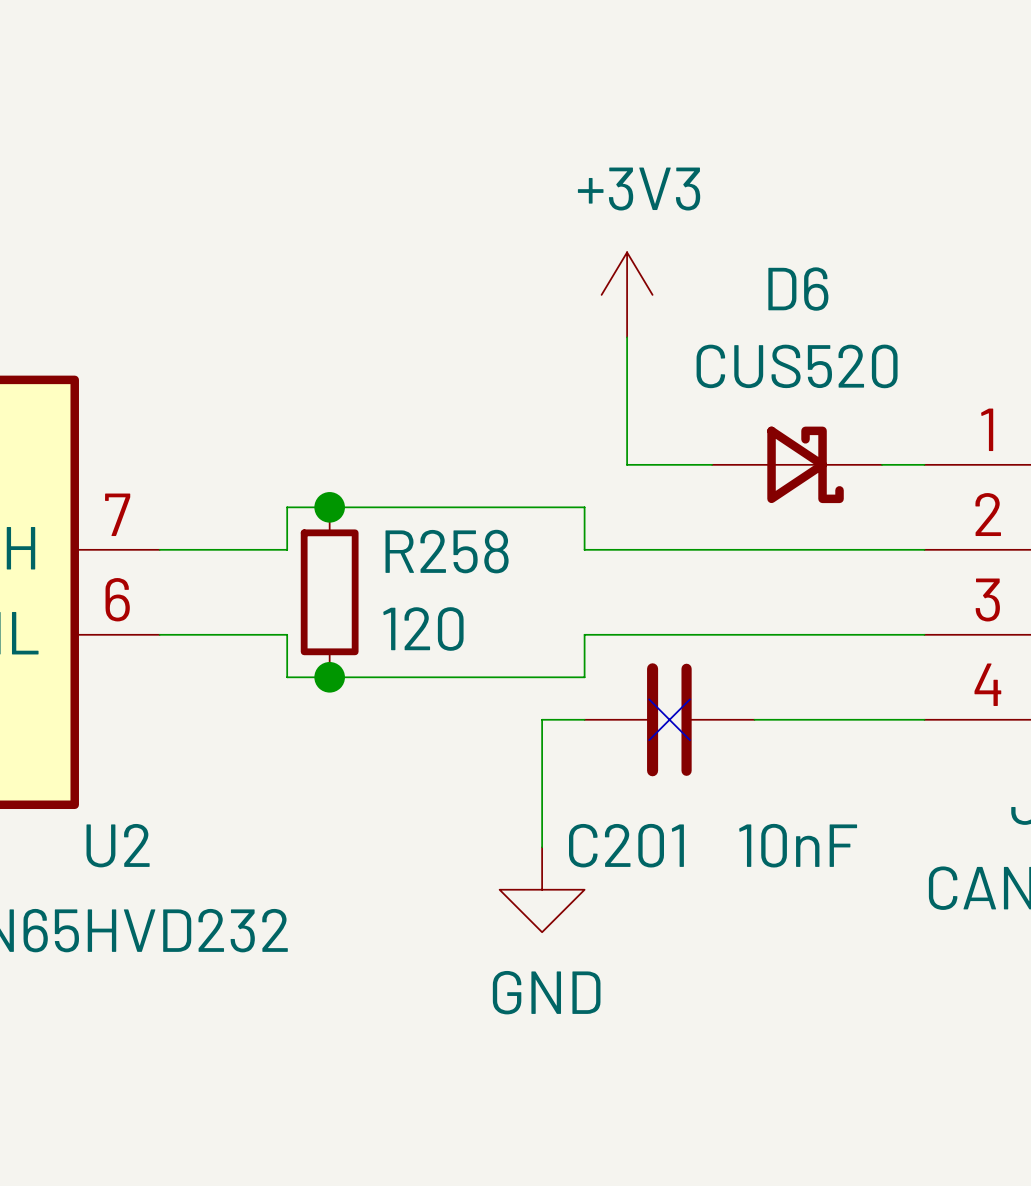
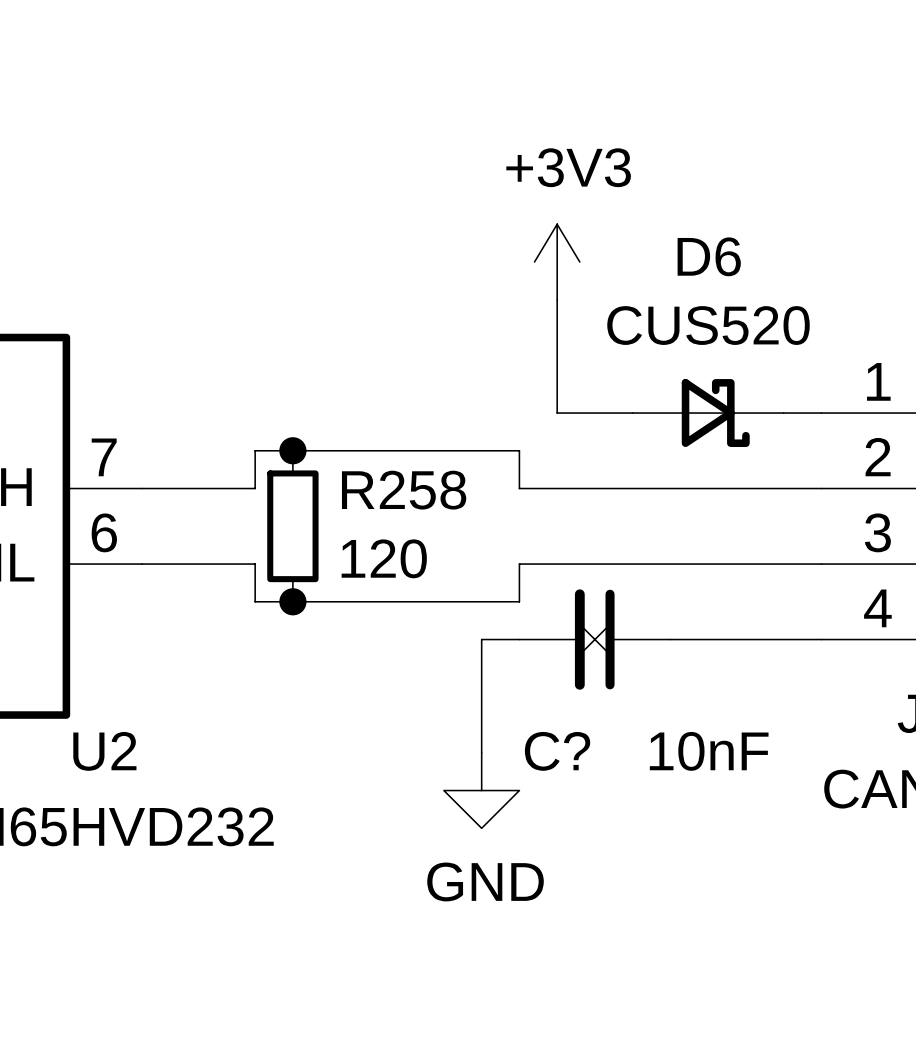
C201 name: C201 (626, 845) -> C? (557, 751)

